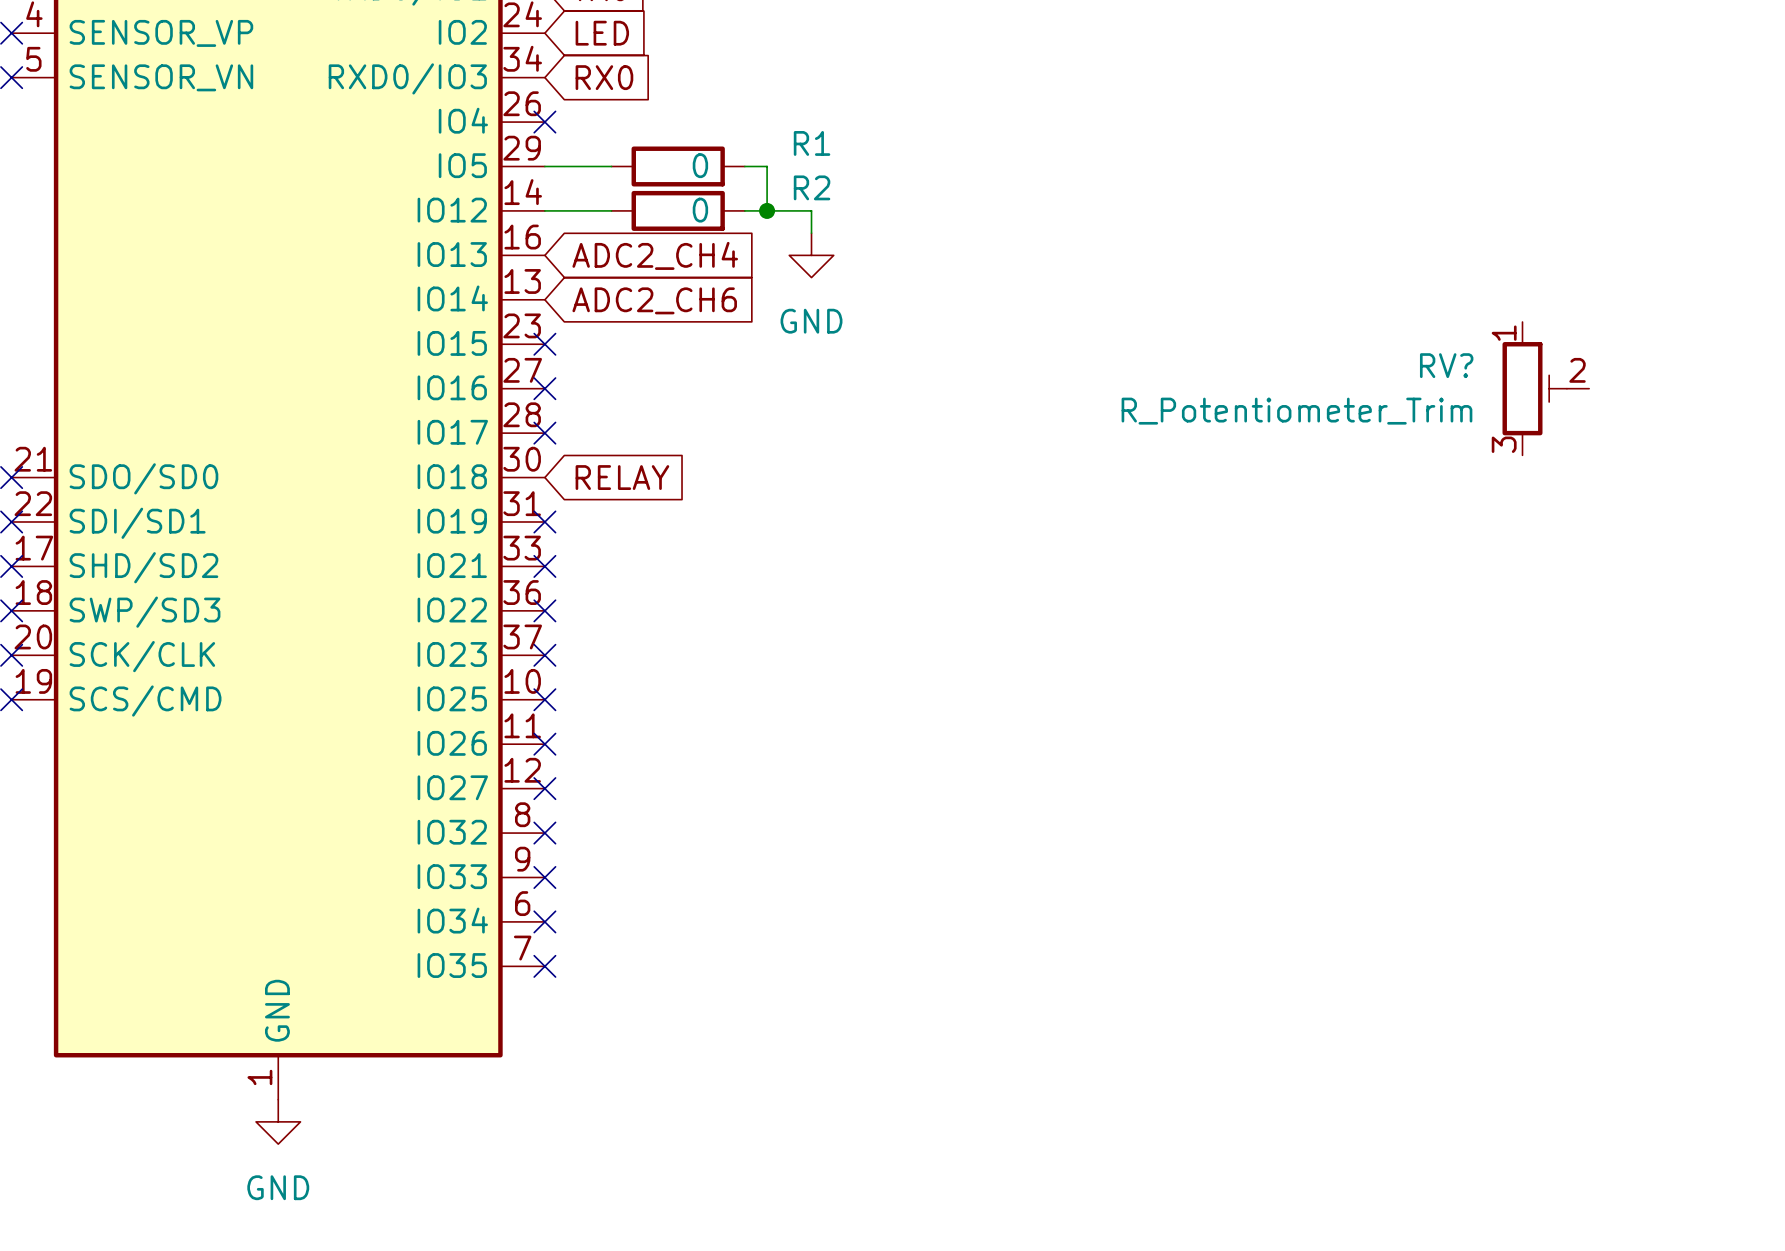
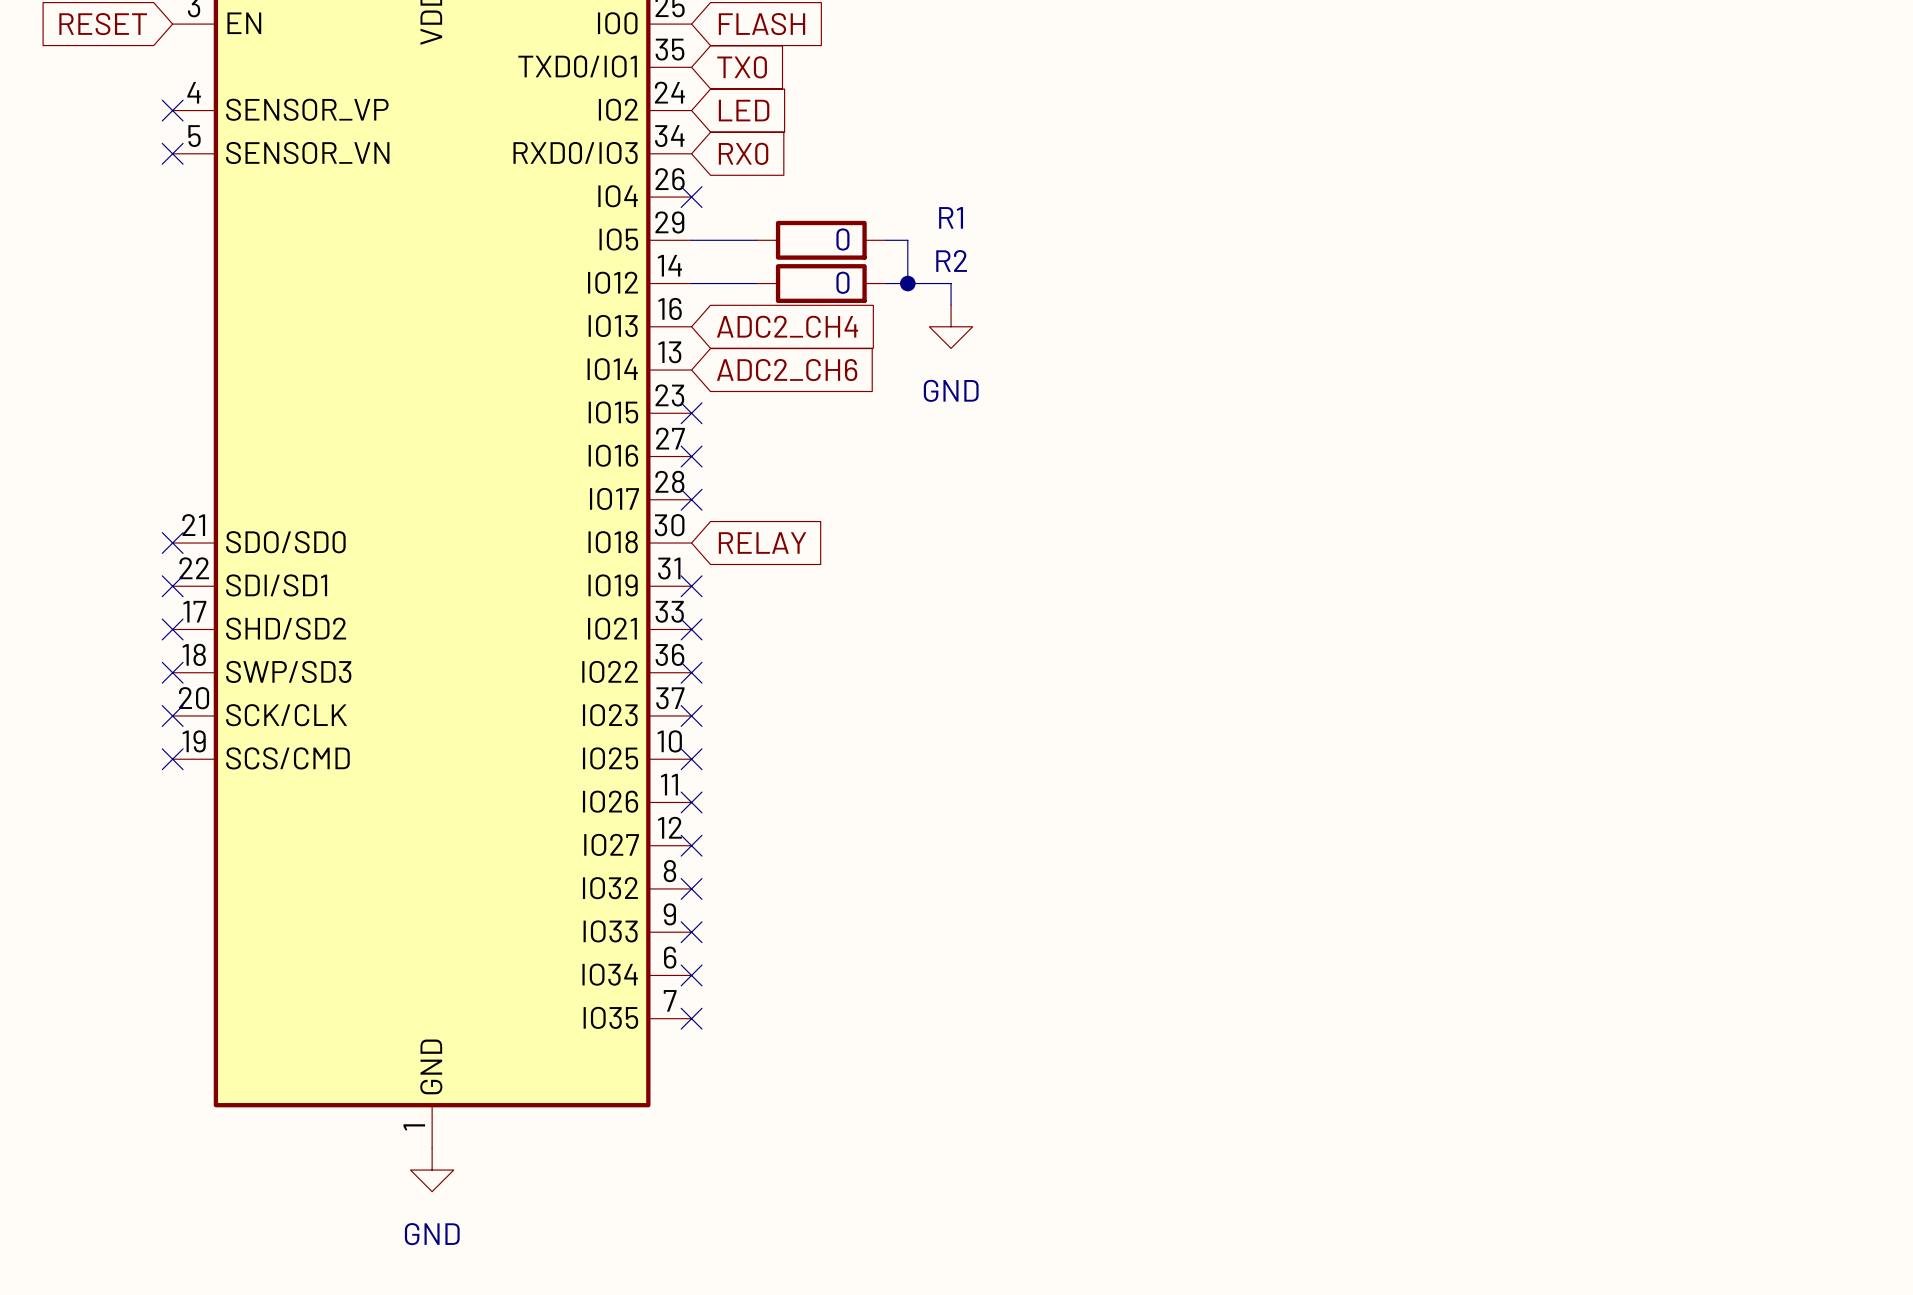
RV?: R_Potentiometer_Trim (1545, 388) -> none

